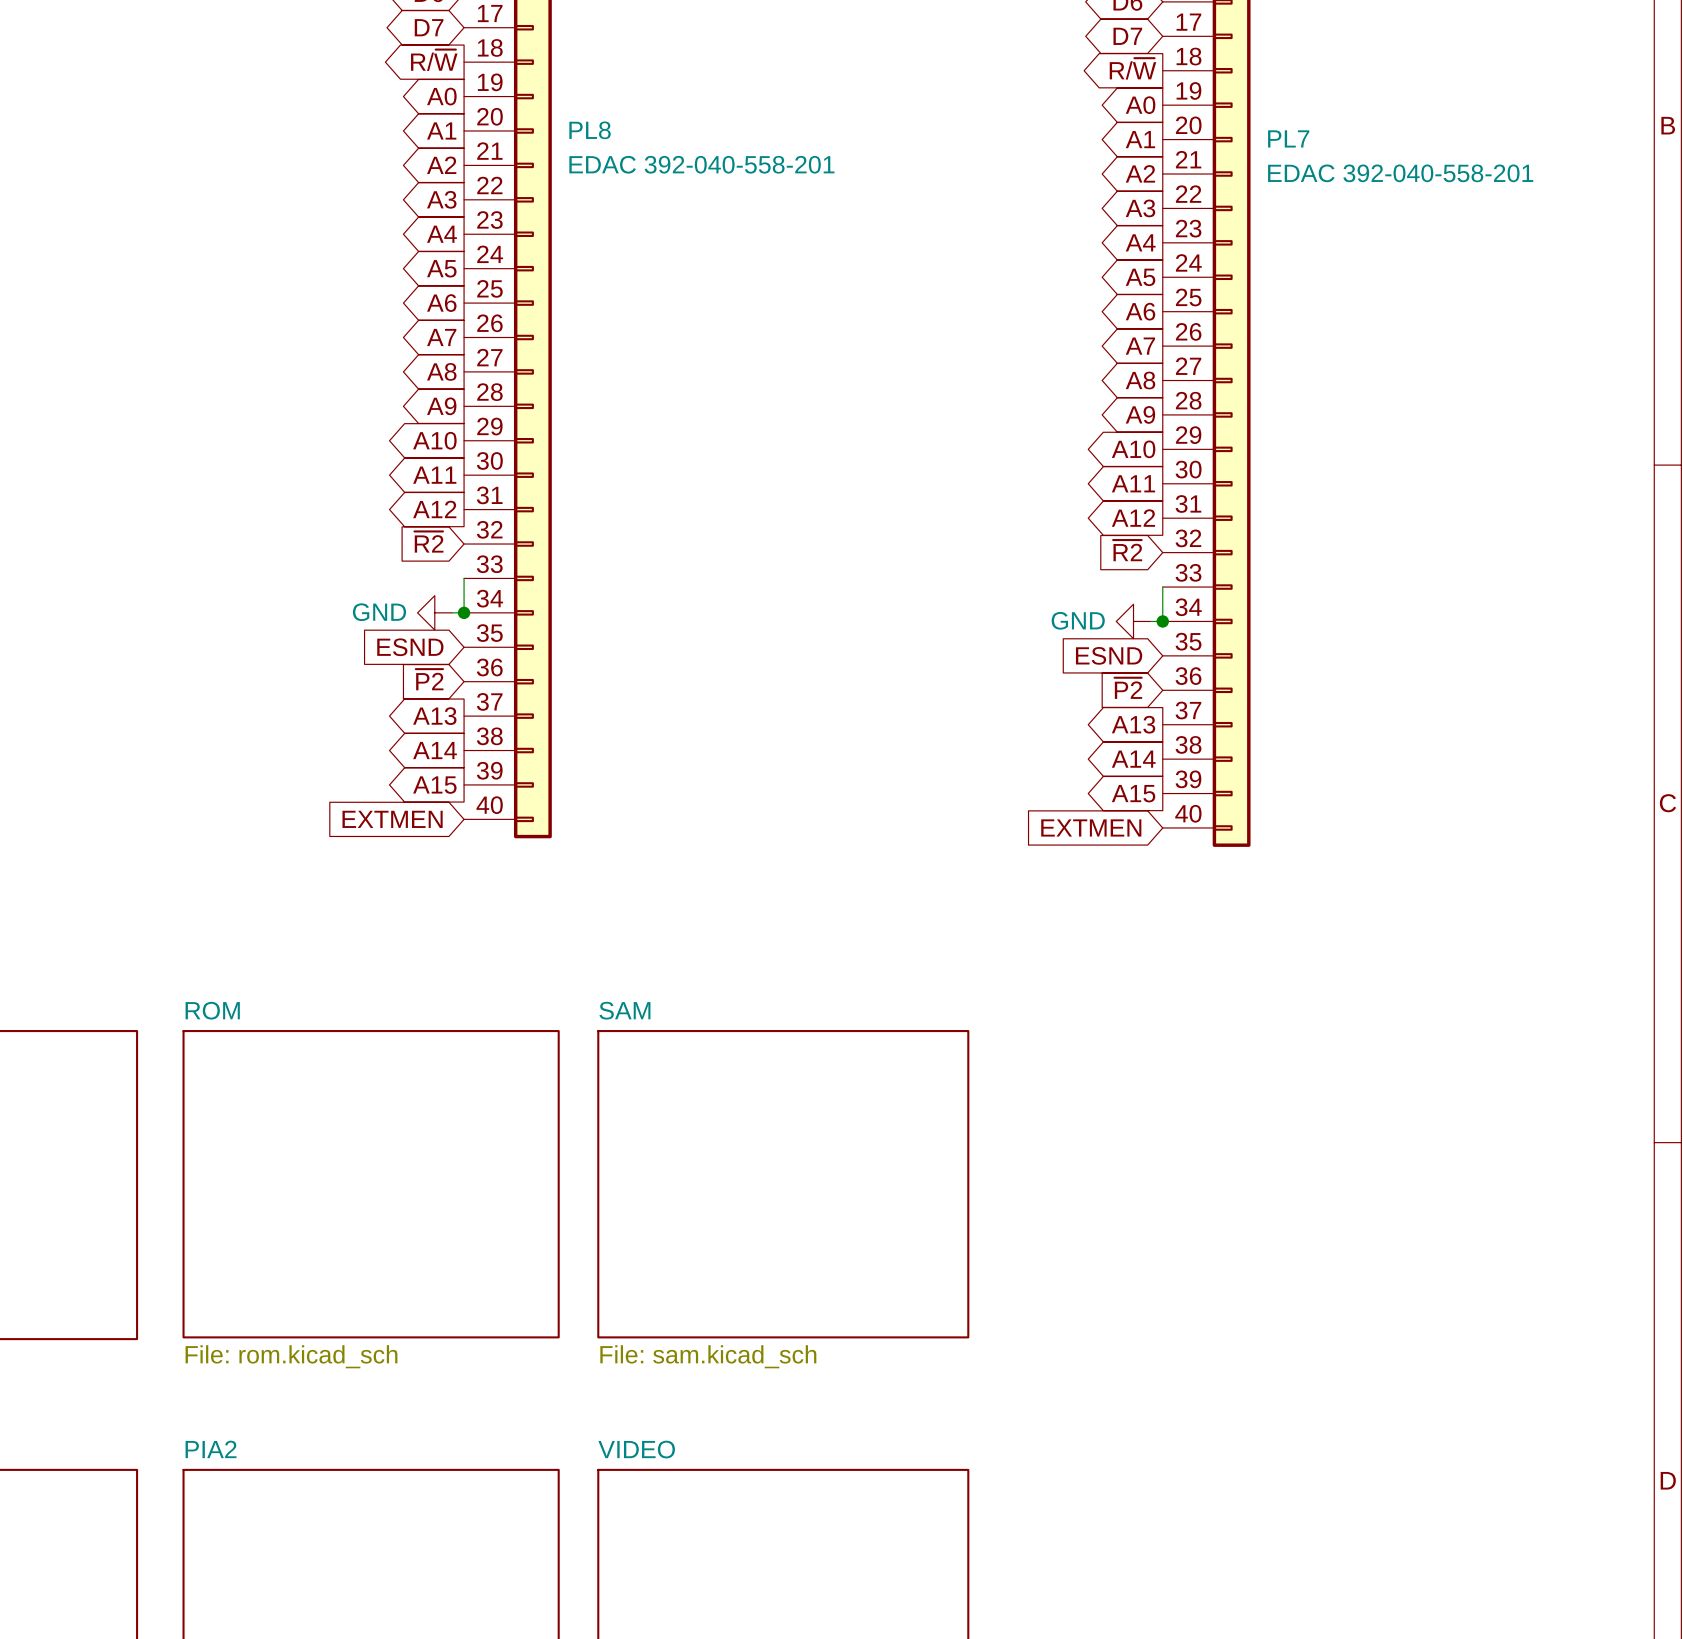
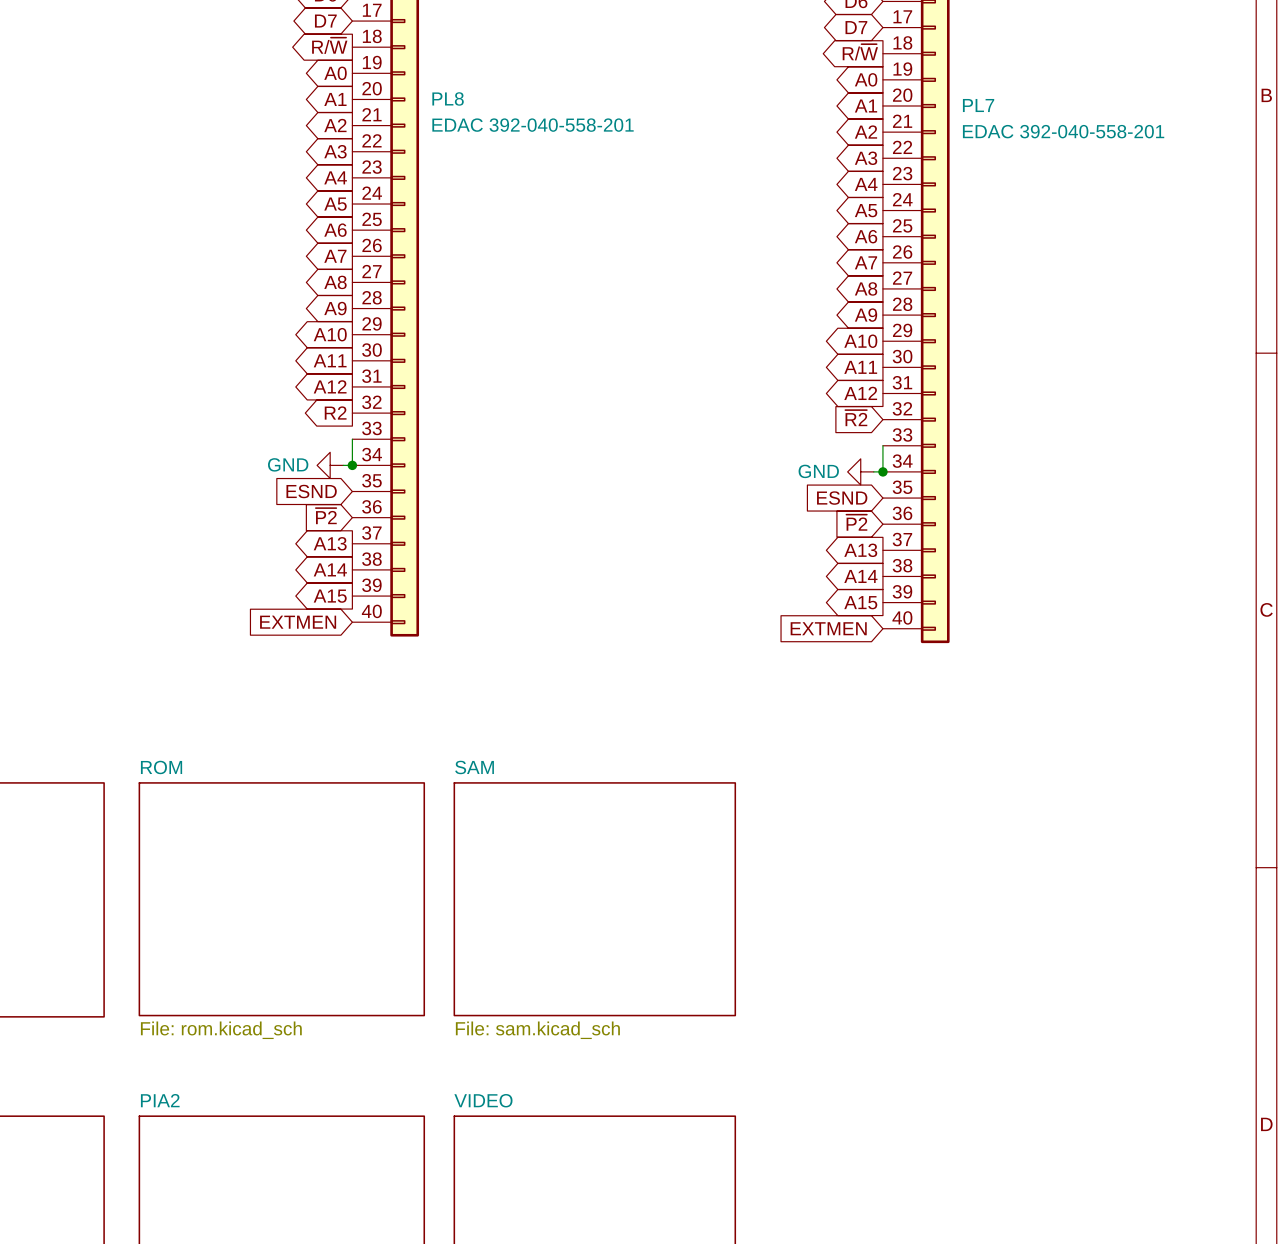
global label shape: input (428, 542) -> output (335, 413)
global label: ~{R2} (428, 542) -> R2 (335, 413)

